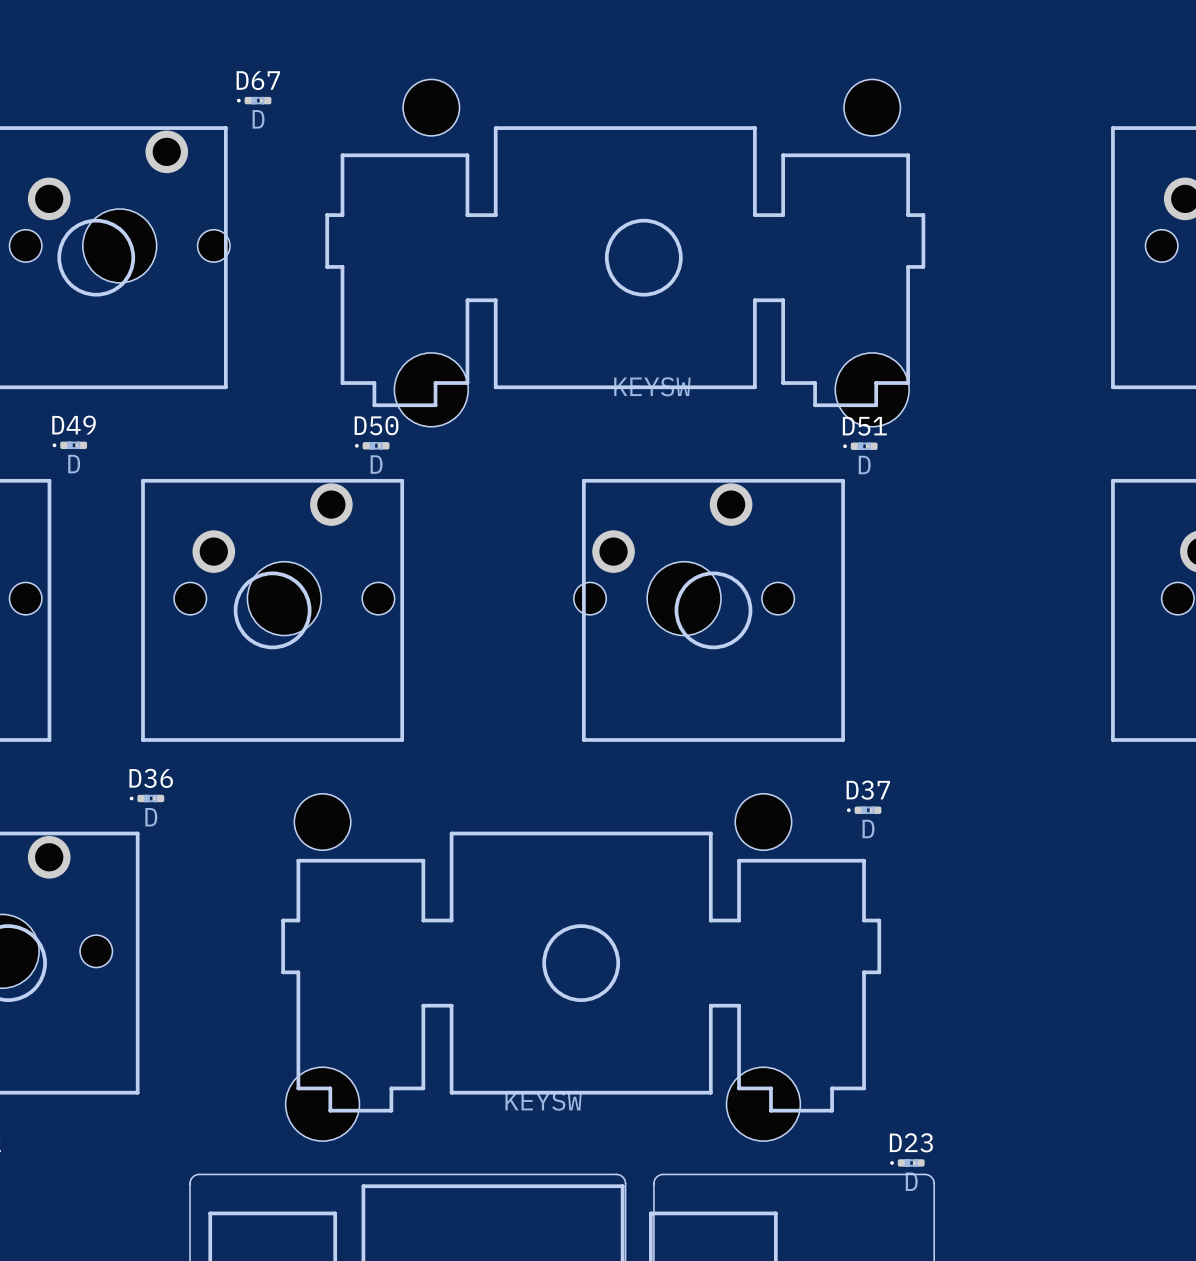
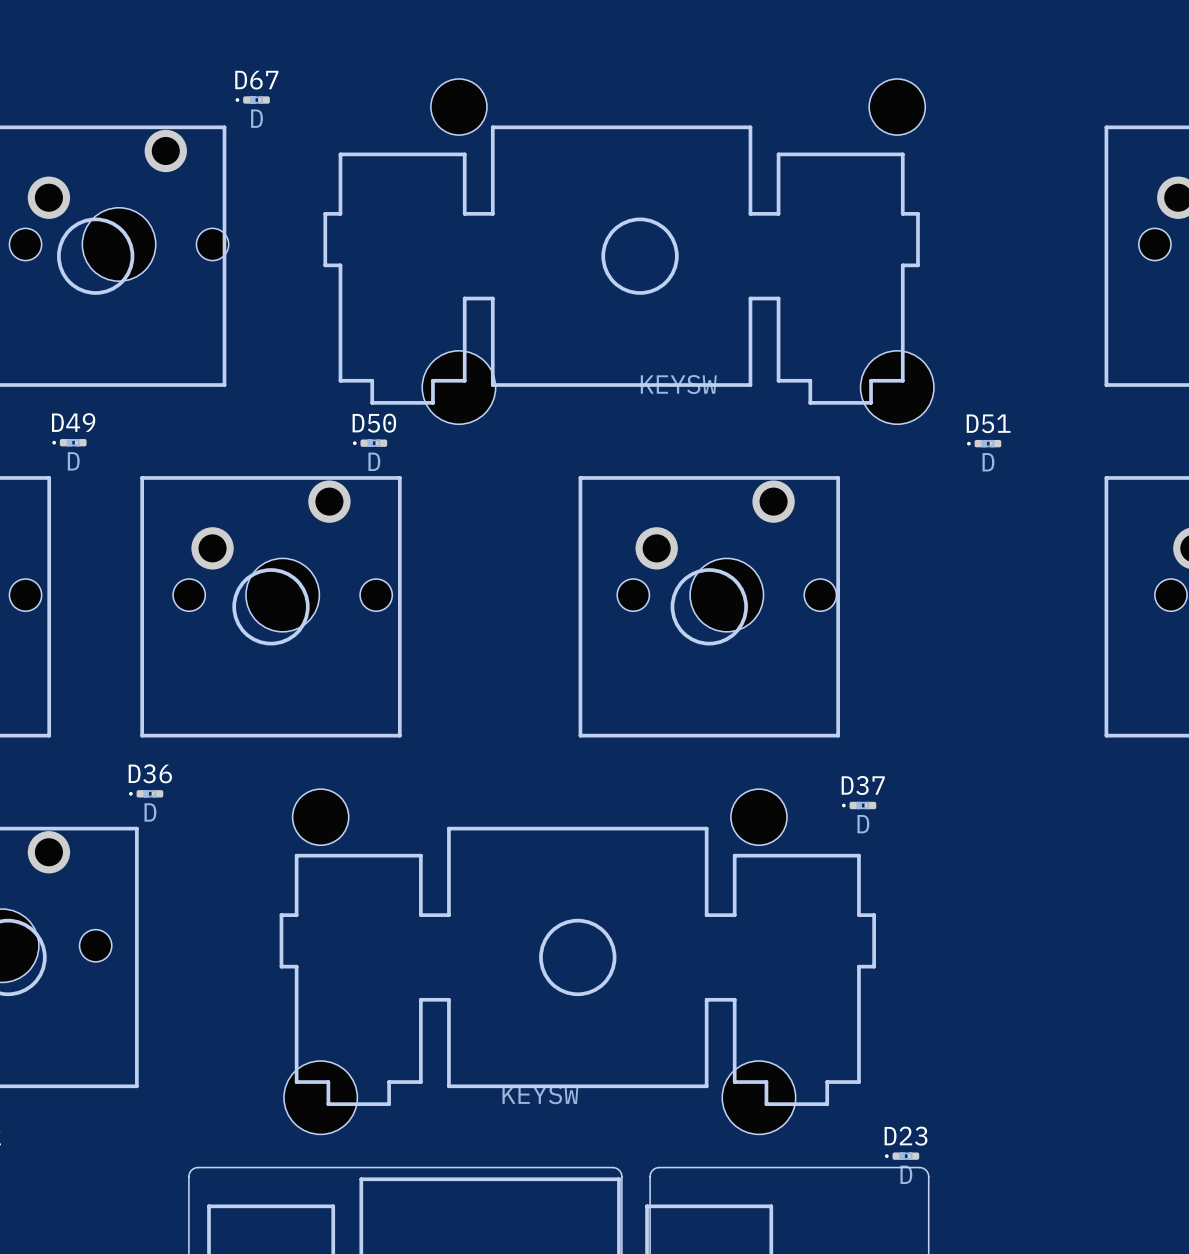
part position: (651, 253) -> (678, 251)
D51 position: (860, 446) -> (984, 443)
part position: (684, 559) -> (726, 556)

